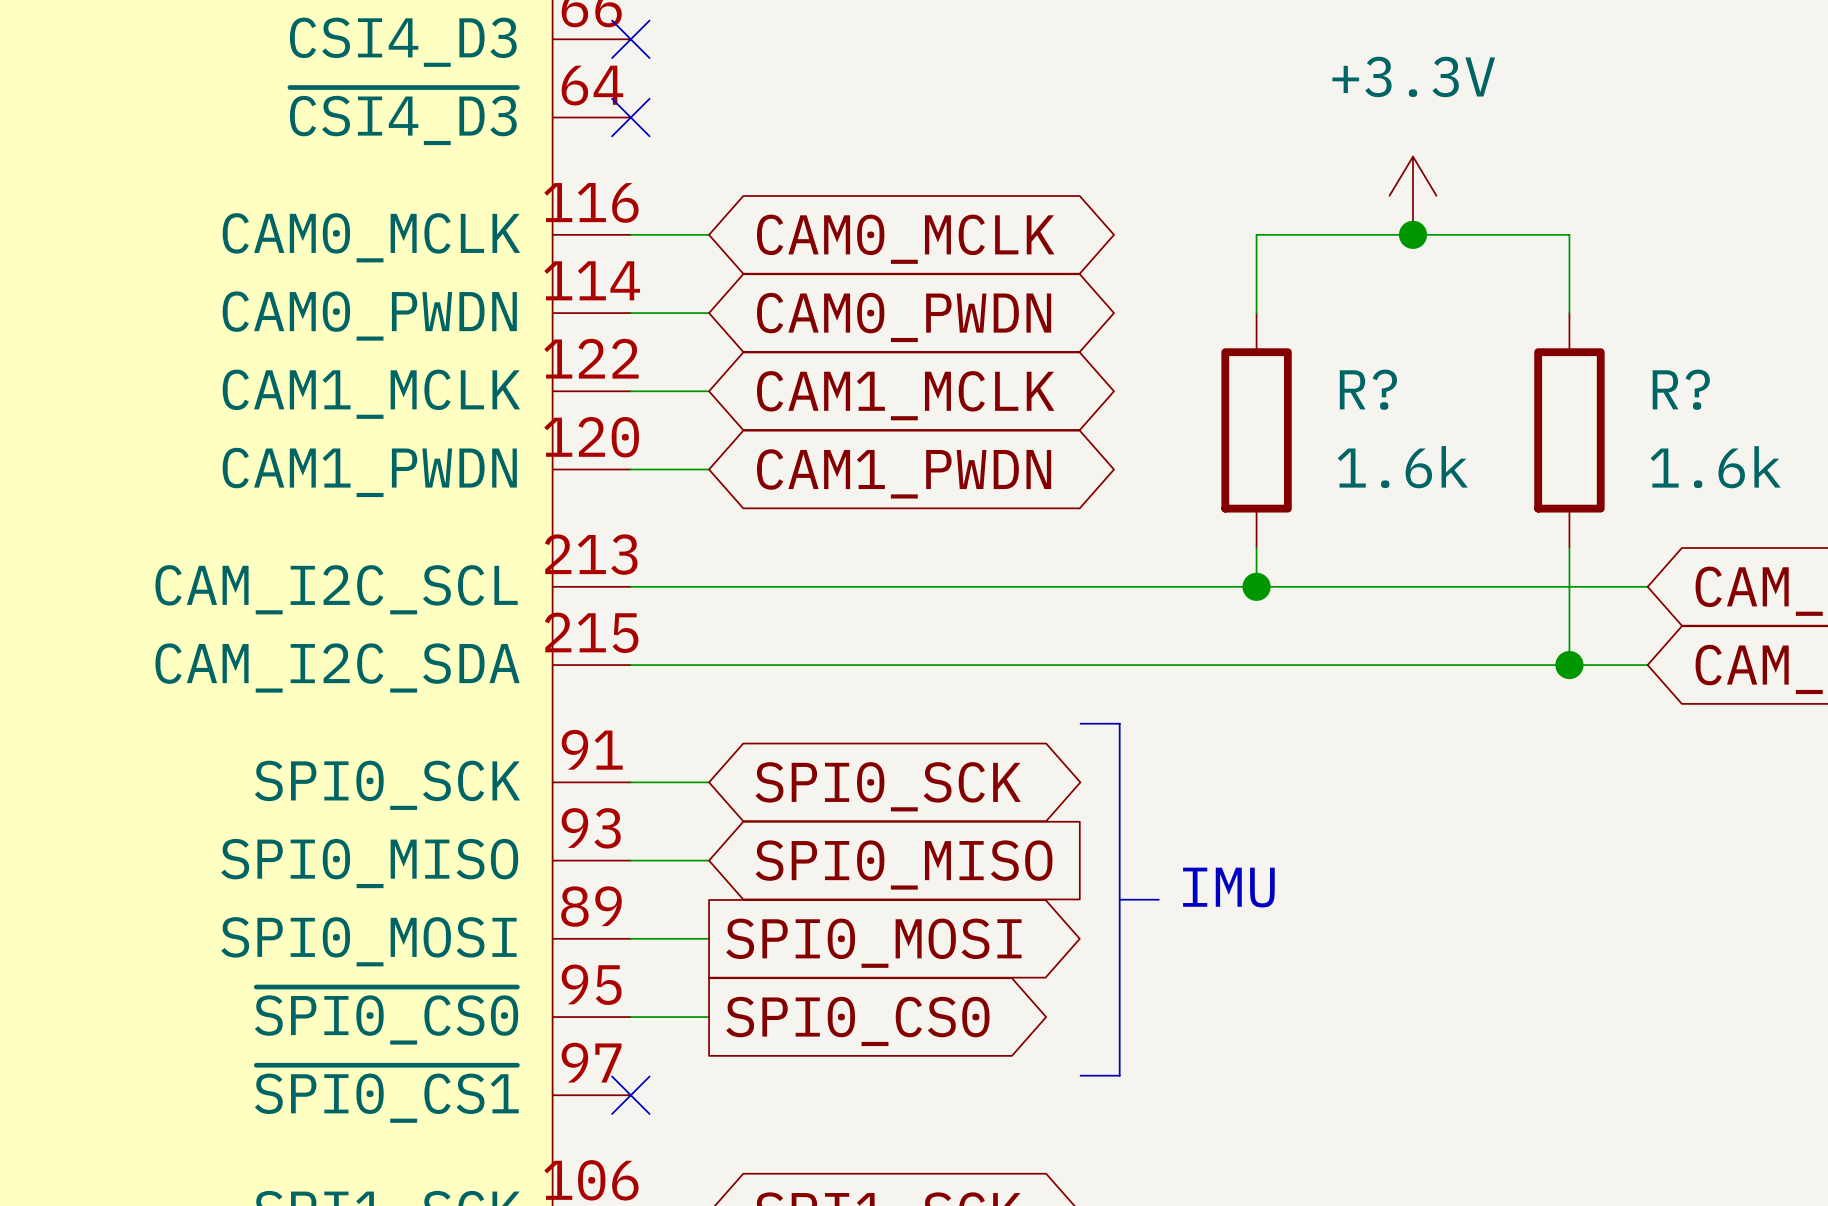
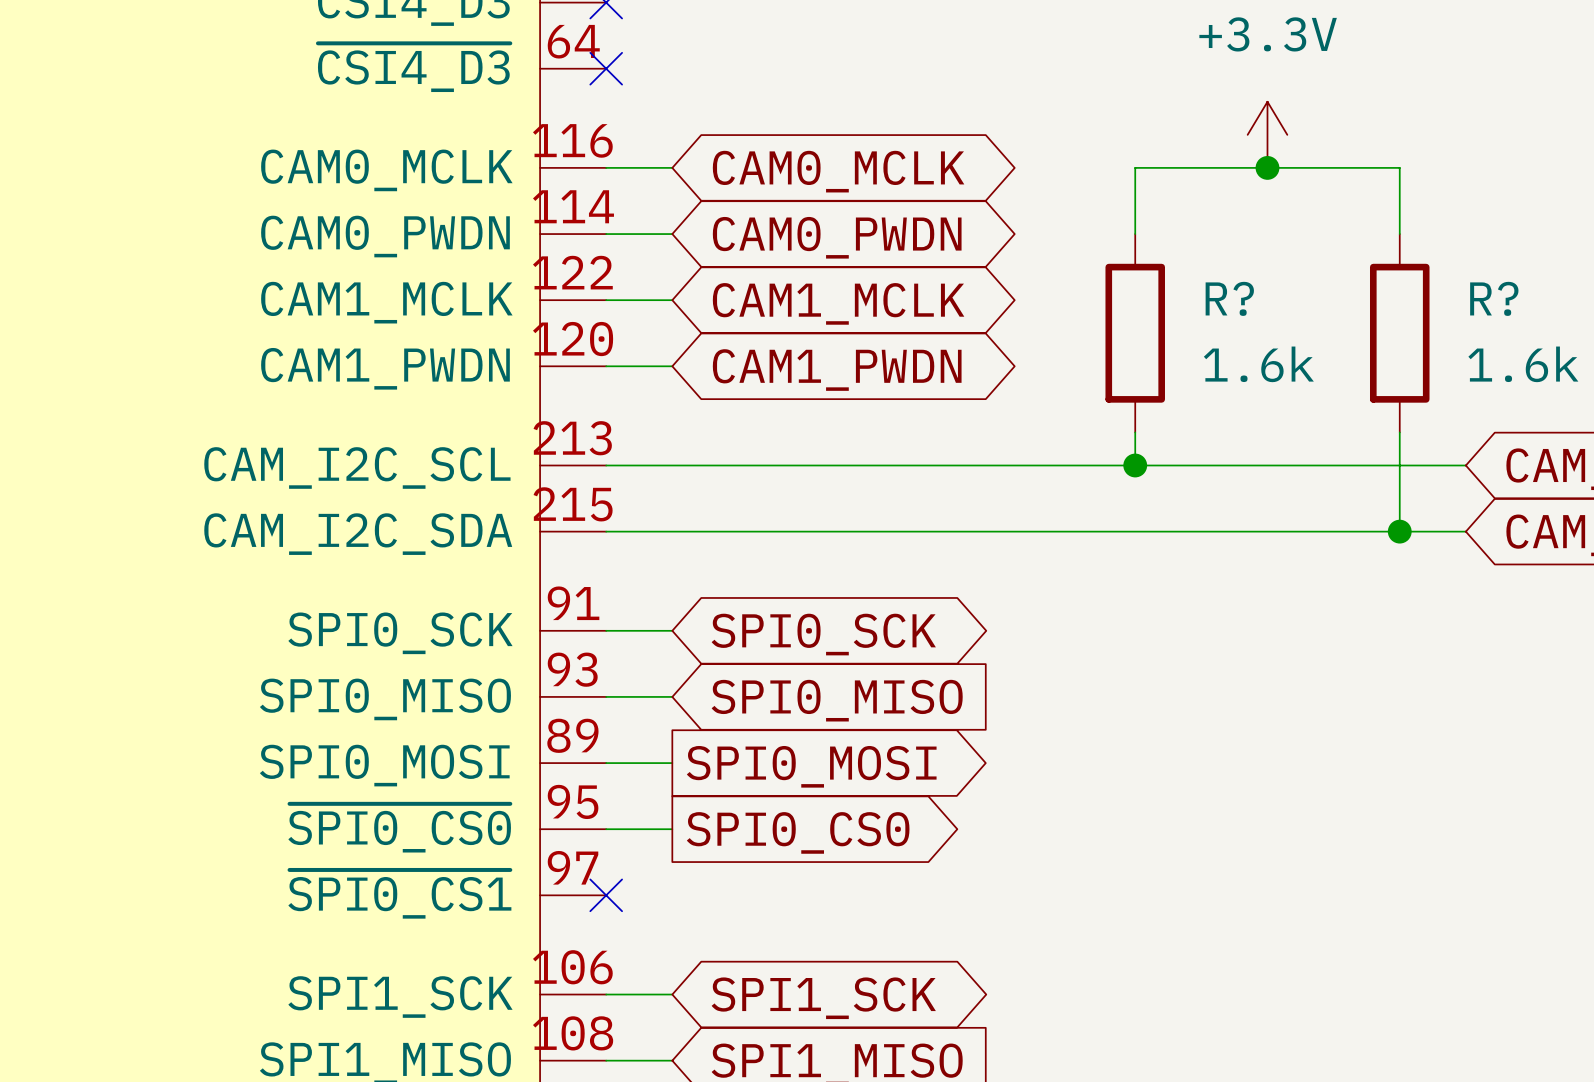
line: (1080, 723) (1119, 723) (1119, 1075) (1080, 1075) -> none
text: IMU (1228, 887) -> none
line: (1119, 899) (1158, 899) -> none

